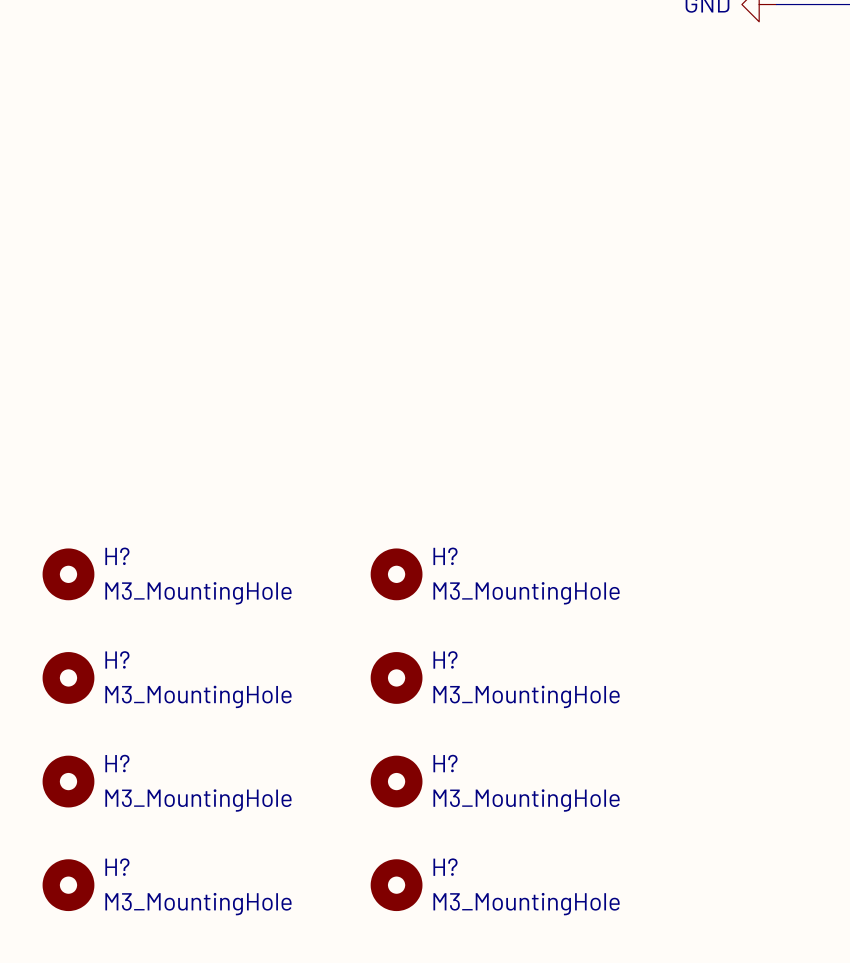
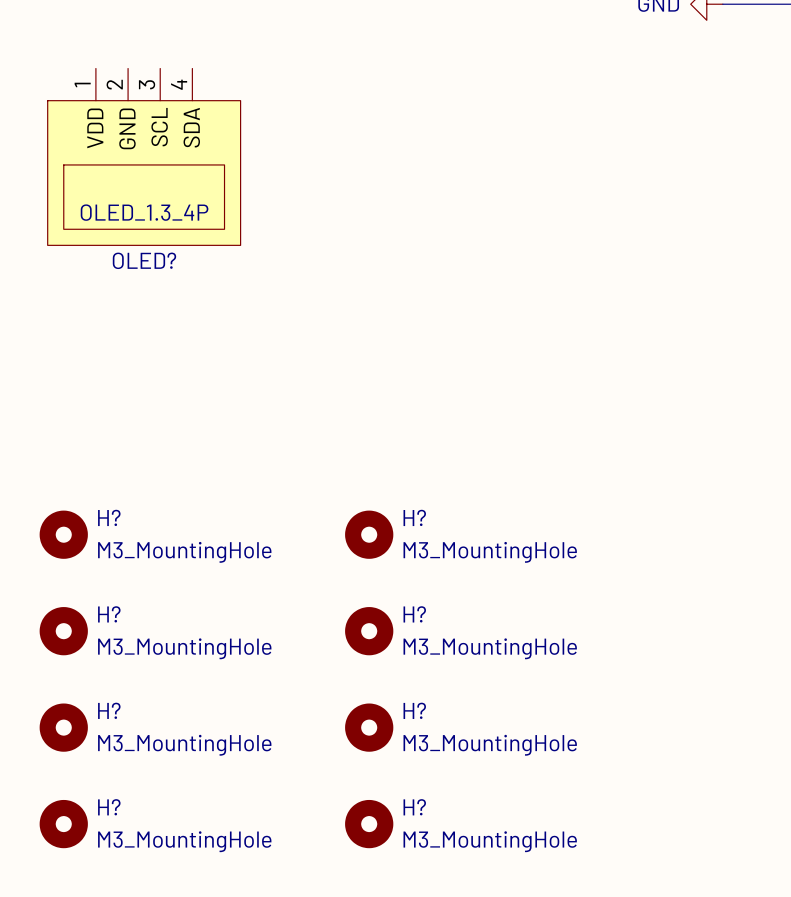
OLED?: none -> OLED_1.3_4P (144, 156)

